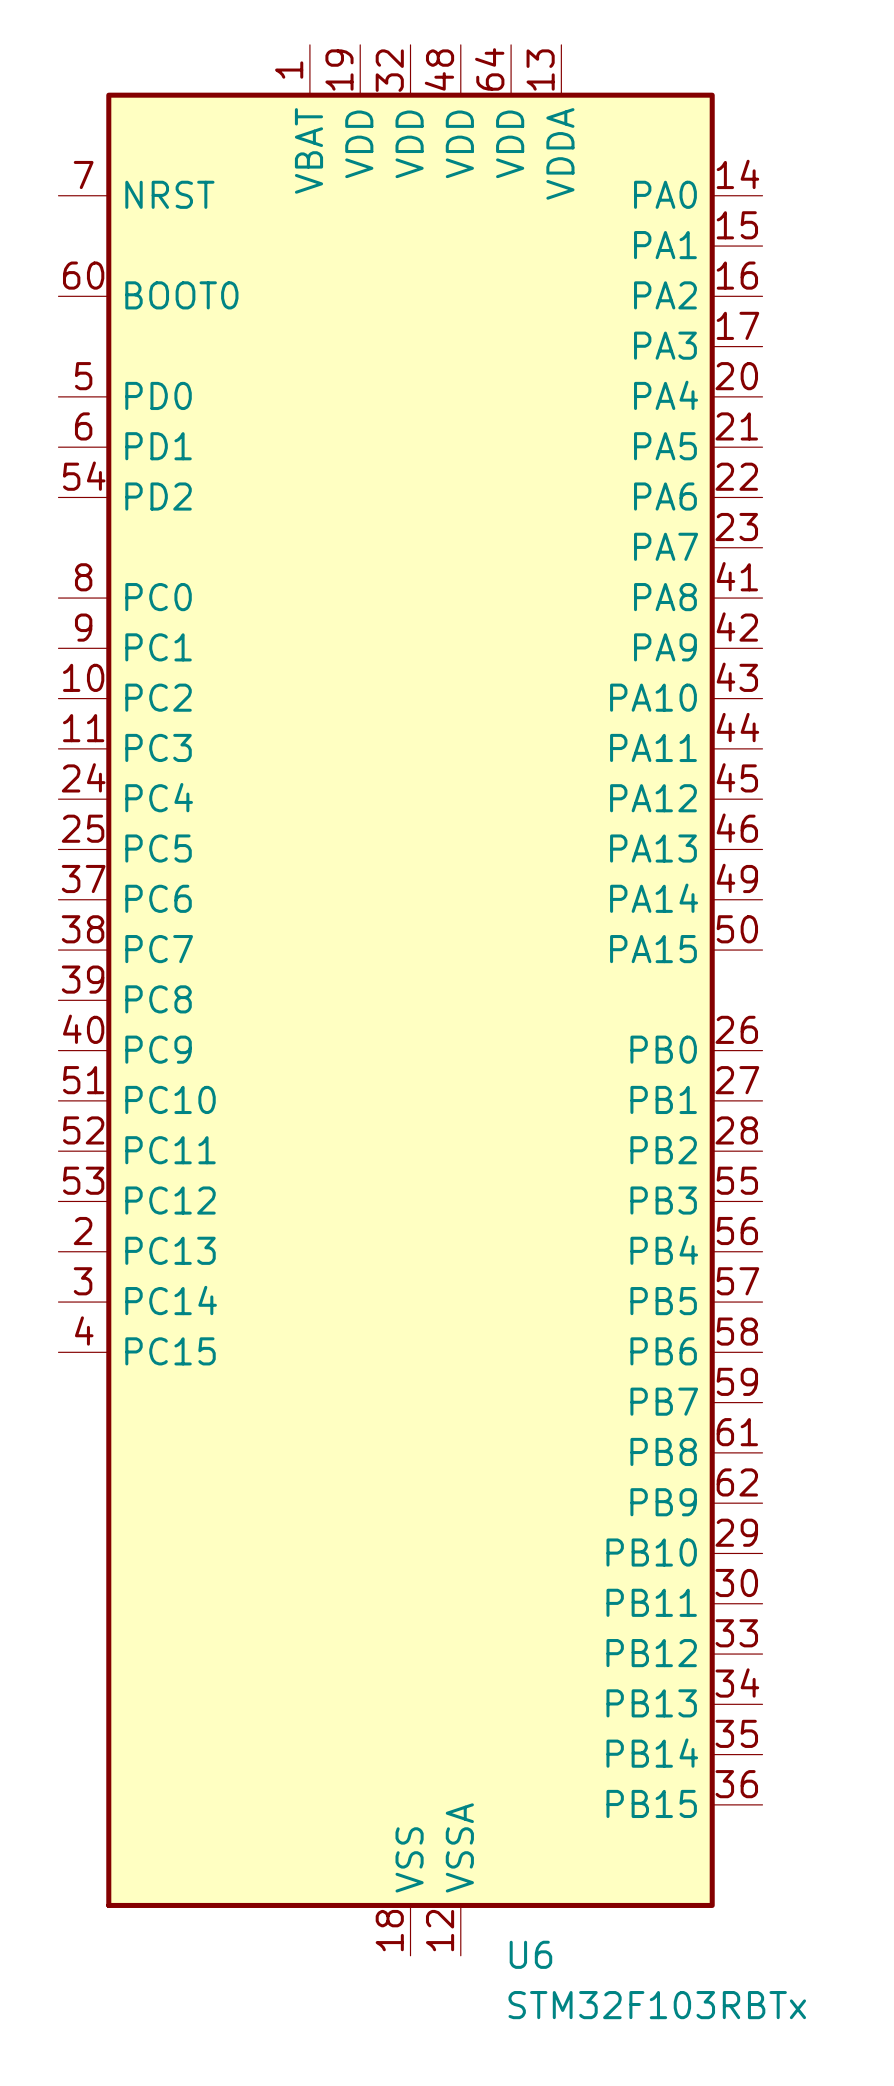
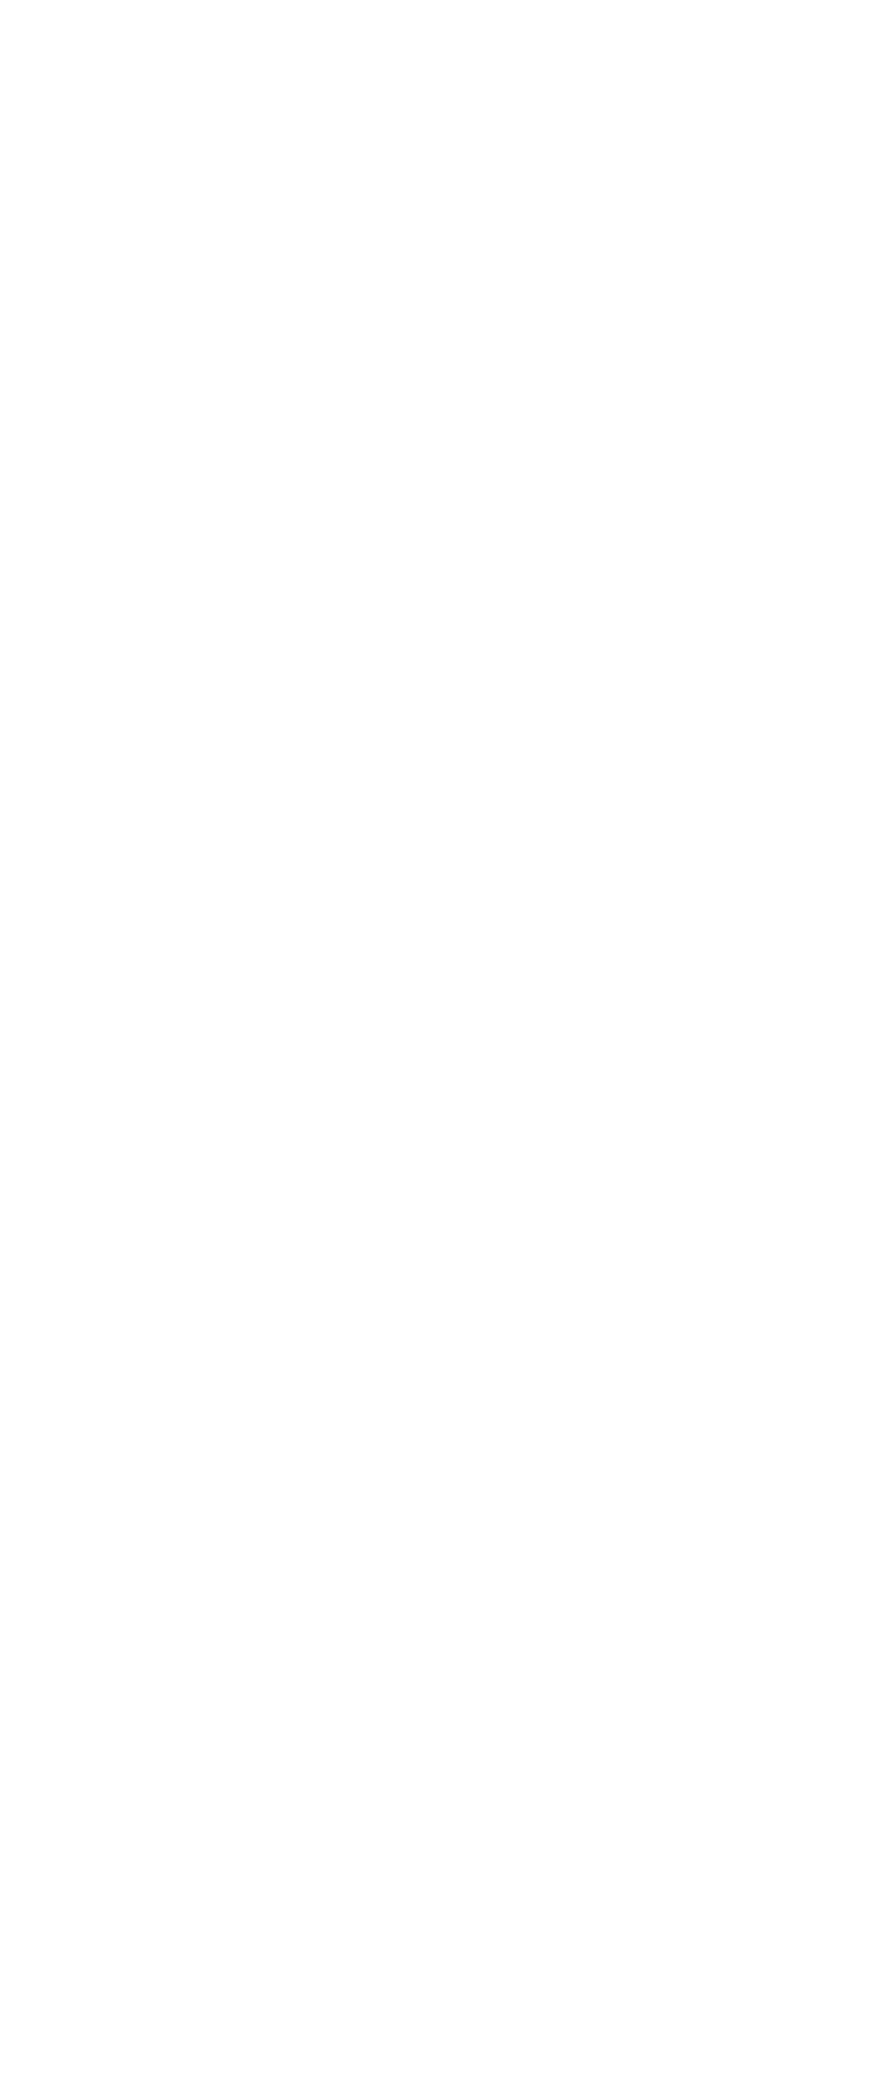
U6: STM32F103RBTx (410, 1000) -> none

